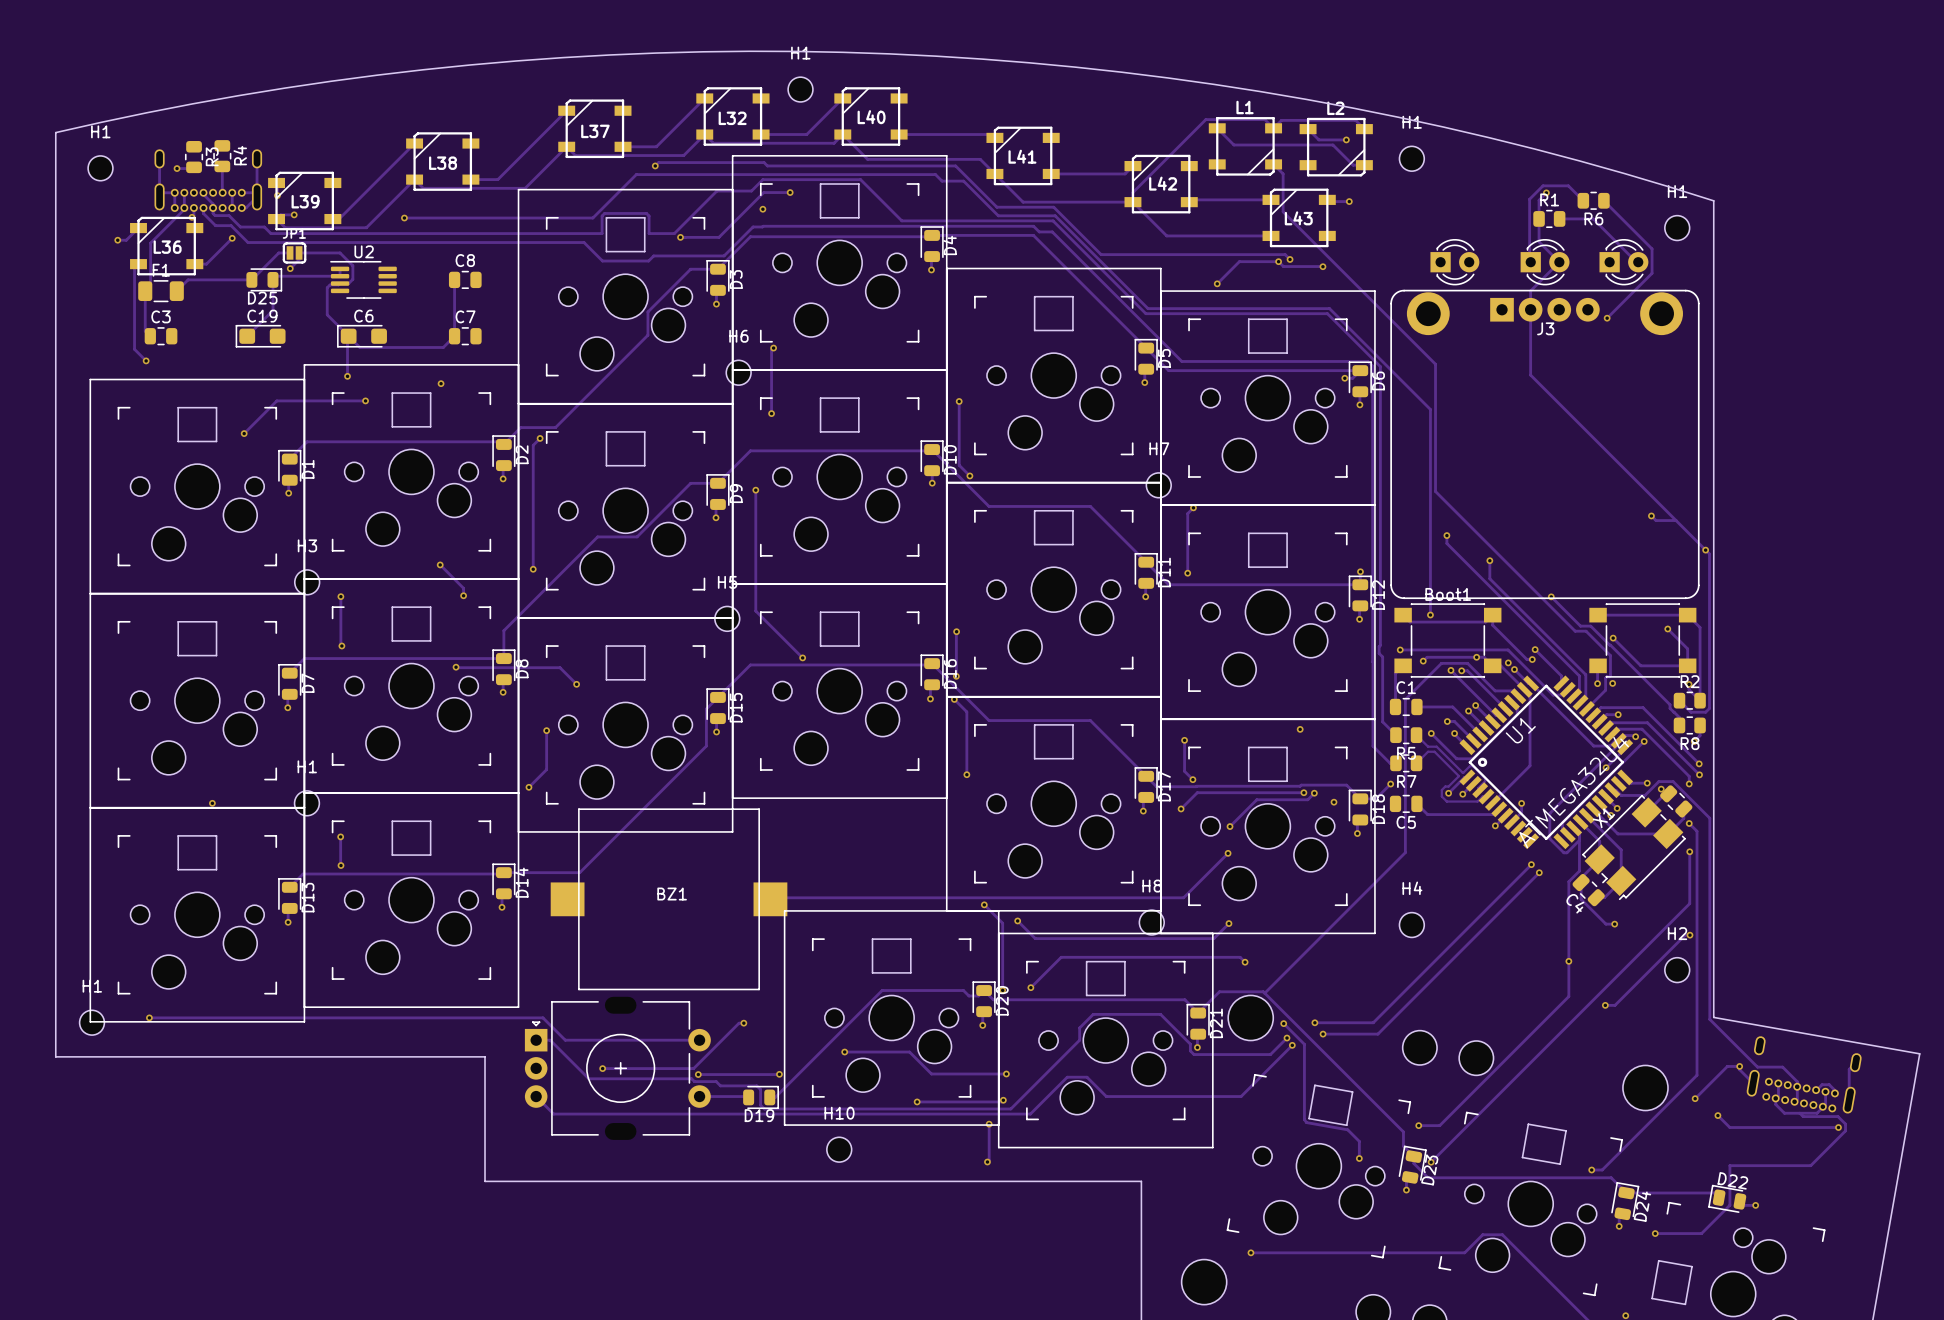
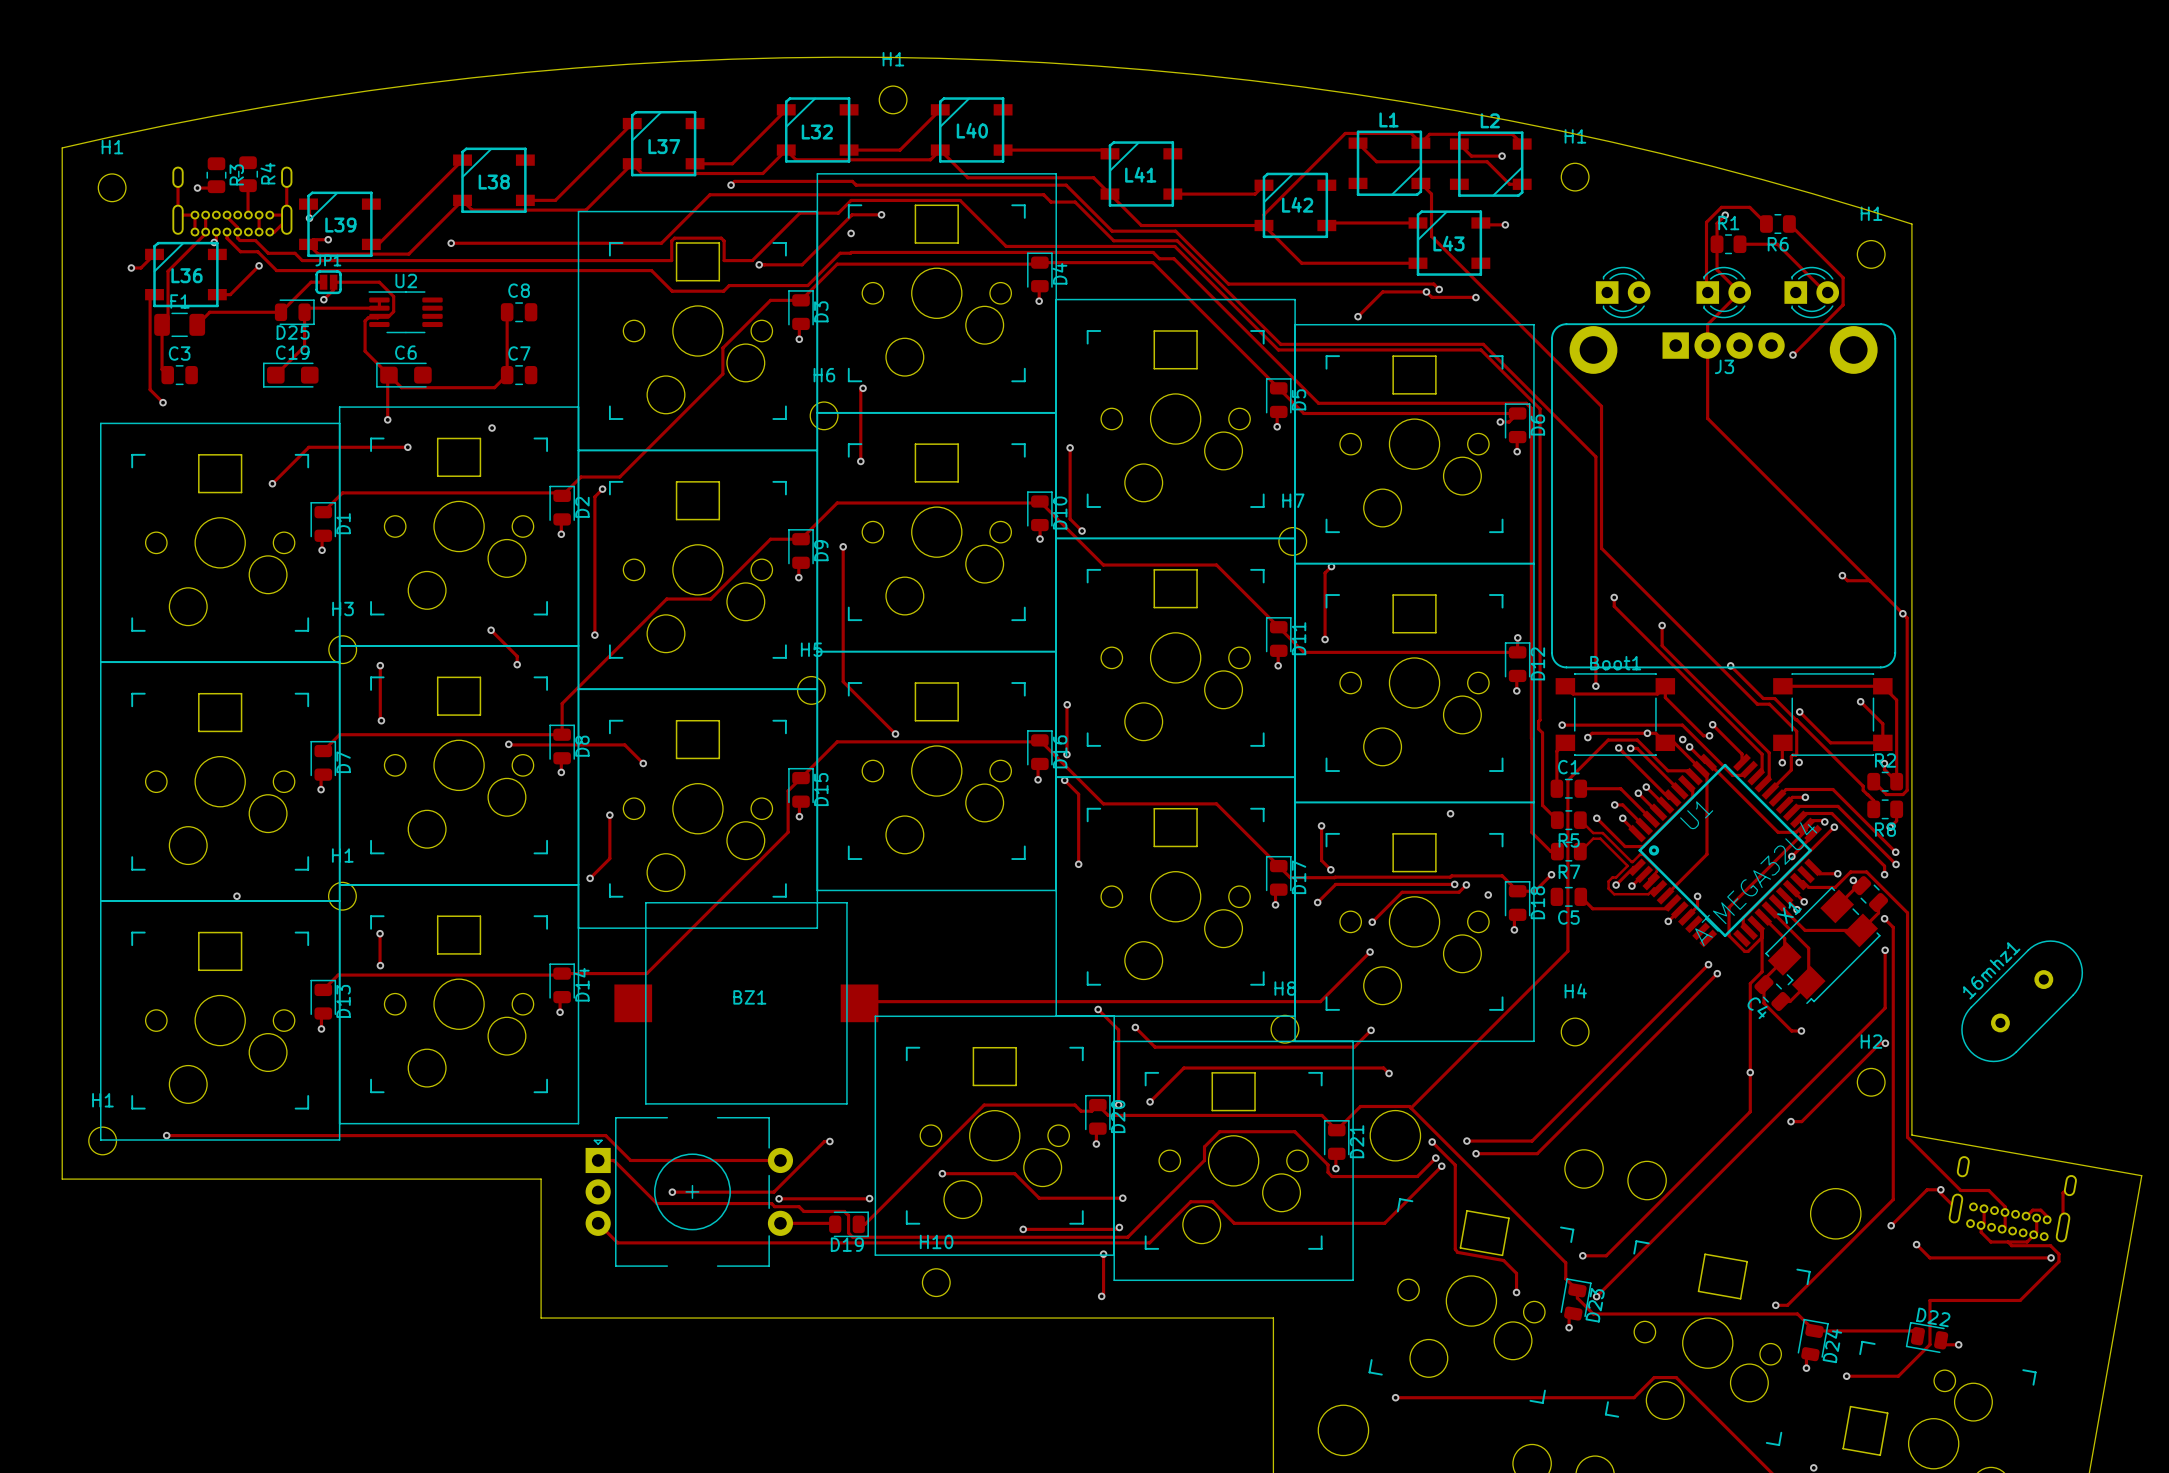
16mhz1: none -> (2022, 1001)

